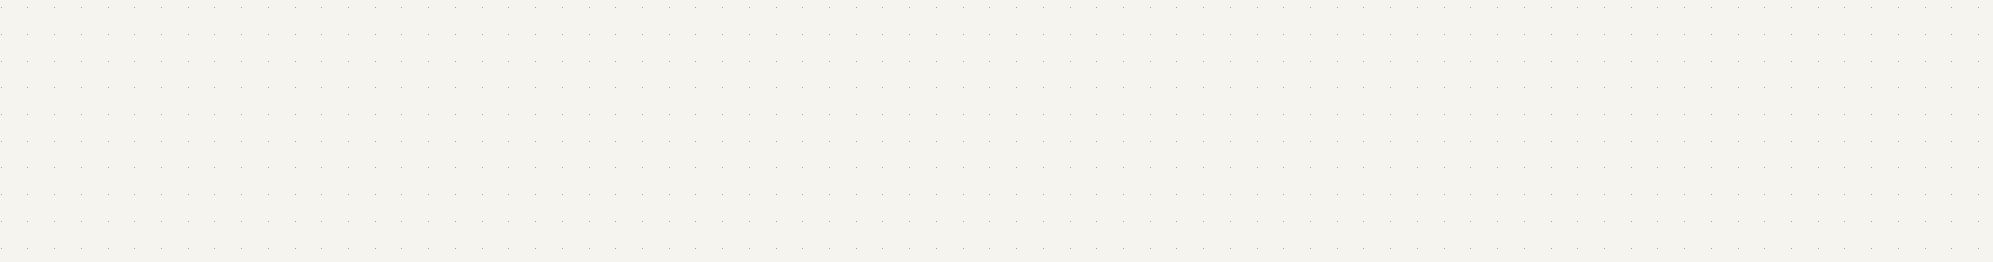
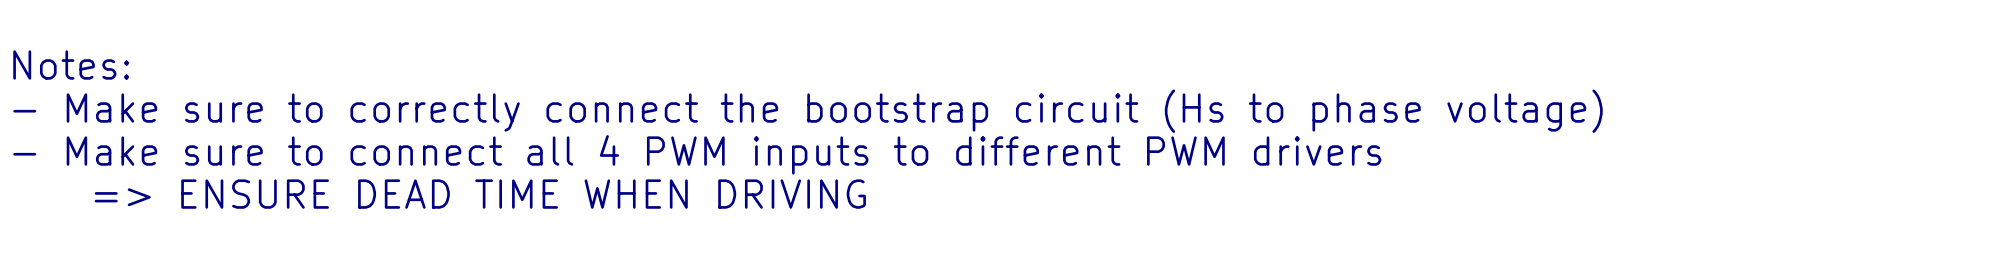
text: none -> Notes: (71, 65)
text: none -> - Make sure to correctly connect the bootstrap circuit (Hs to phase voltage) (807, 111)
text: none -> - Make sure to connect all 4 PWM inputs to different PWM drivers (697, 154)
text: none -> => ENSURE DEAD TIME WHEN DRIVING (480, 194)

